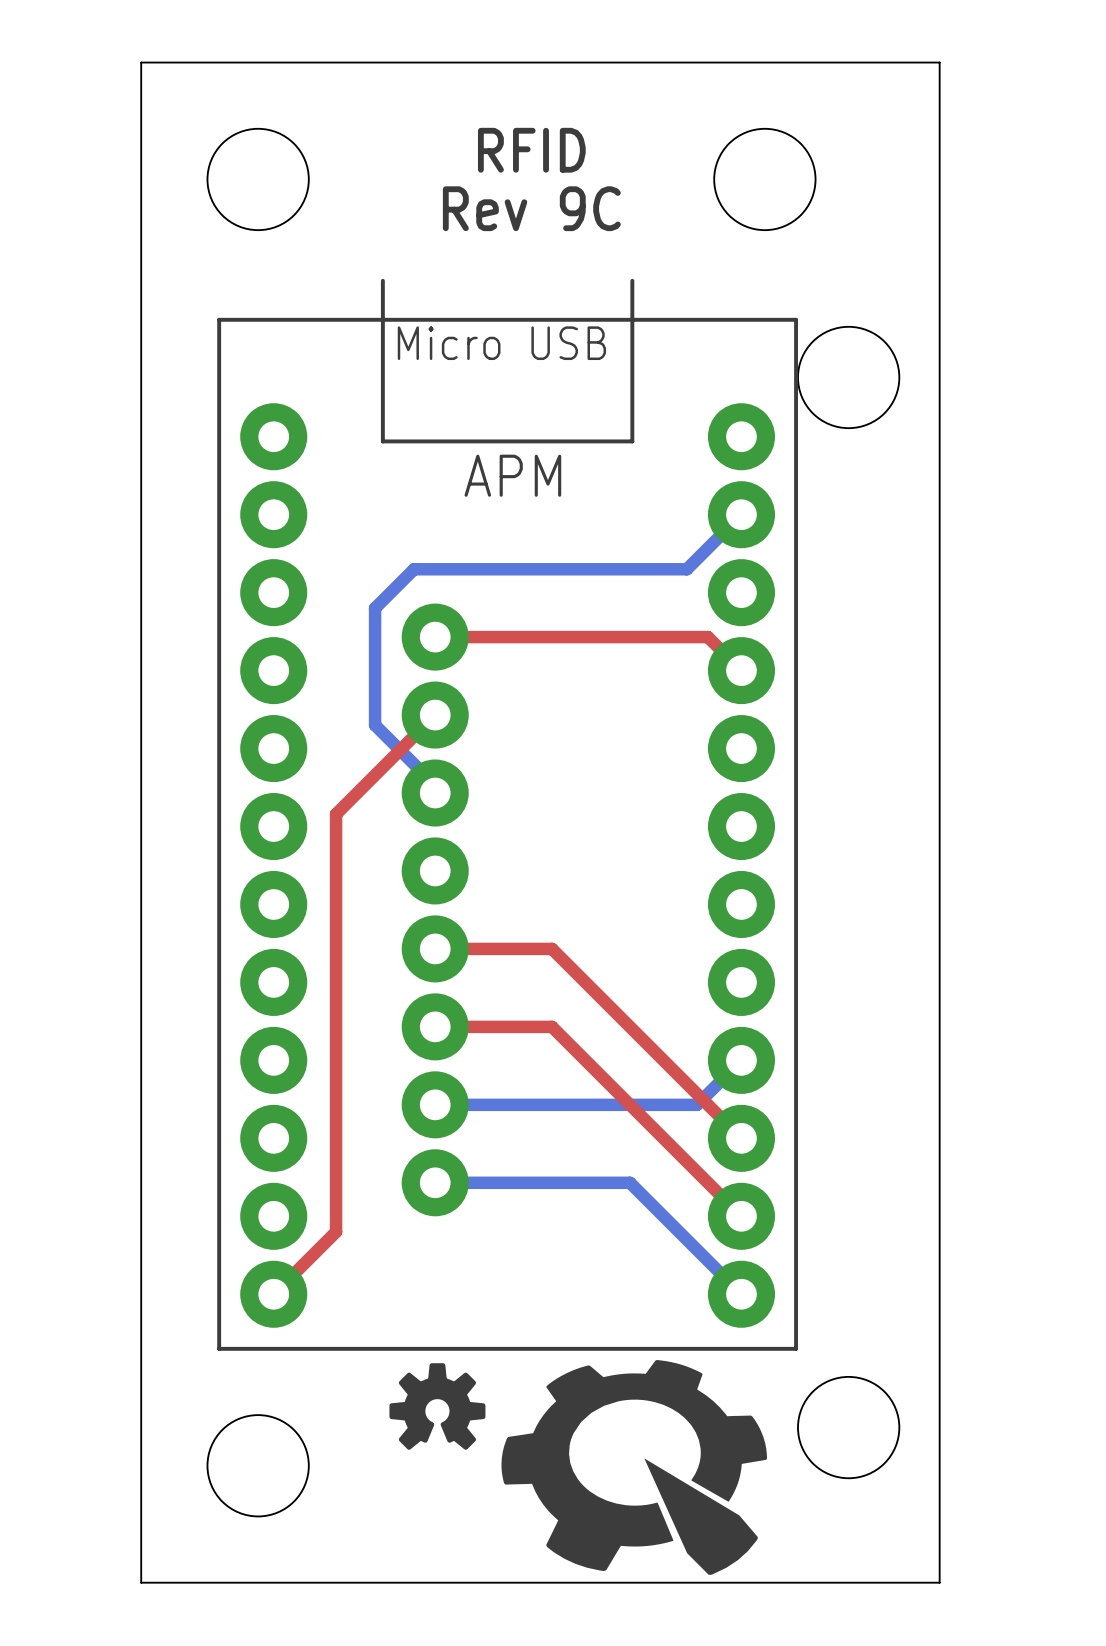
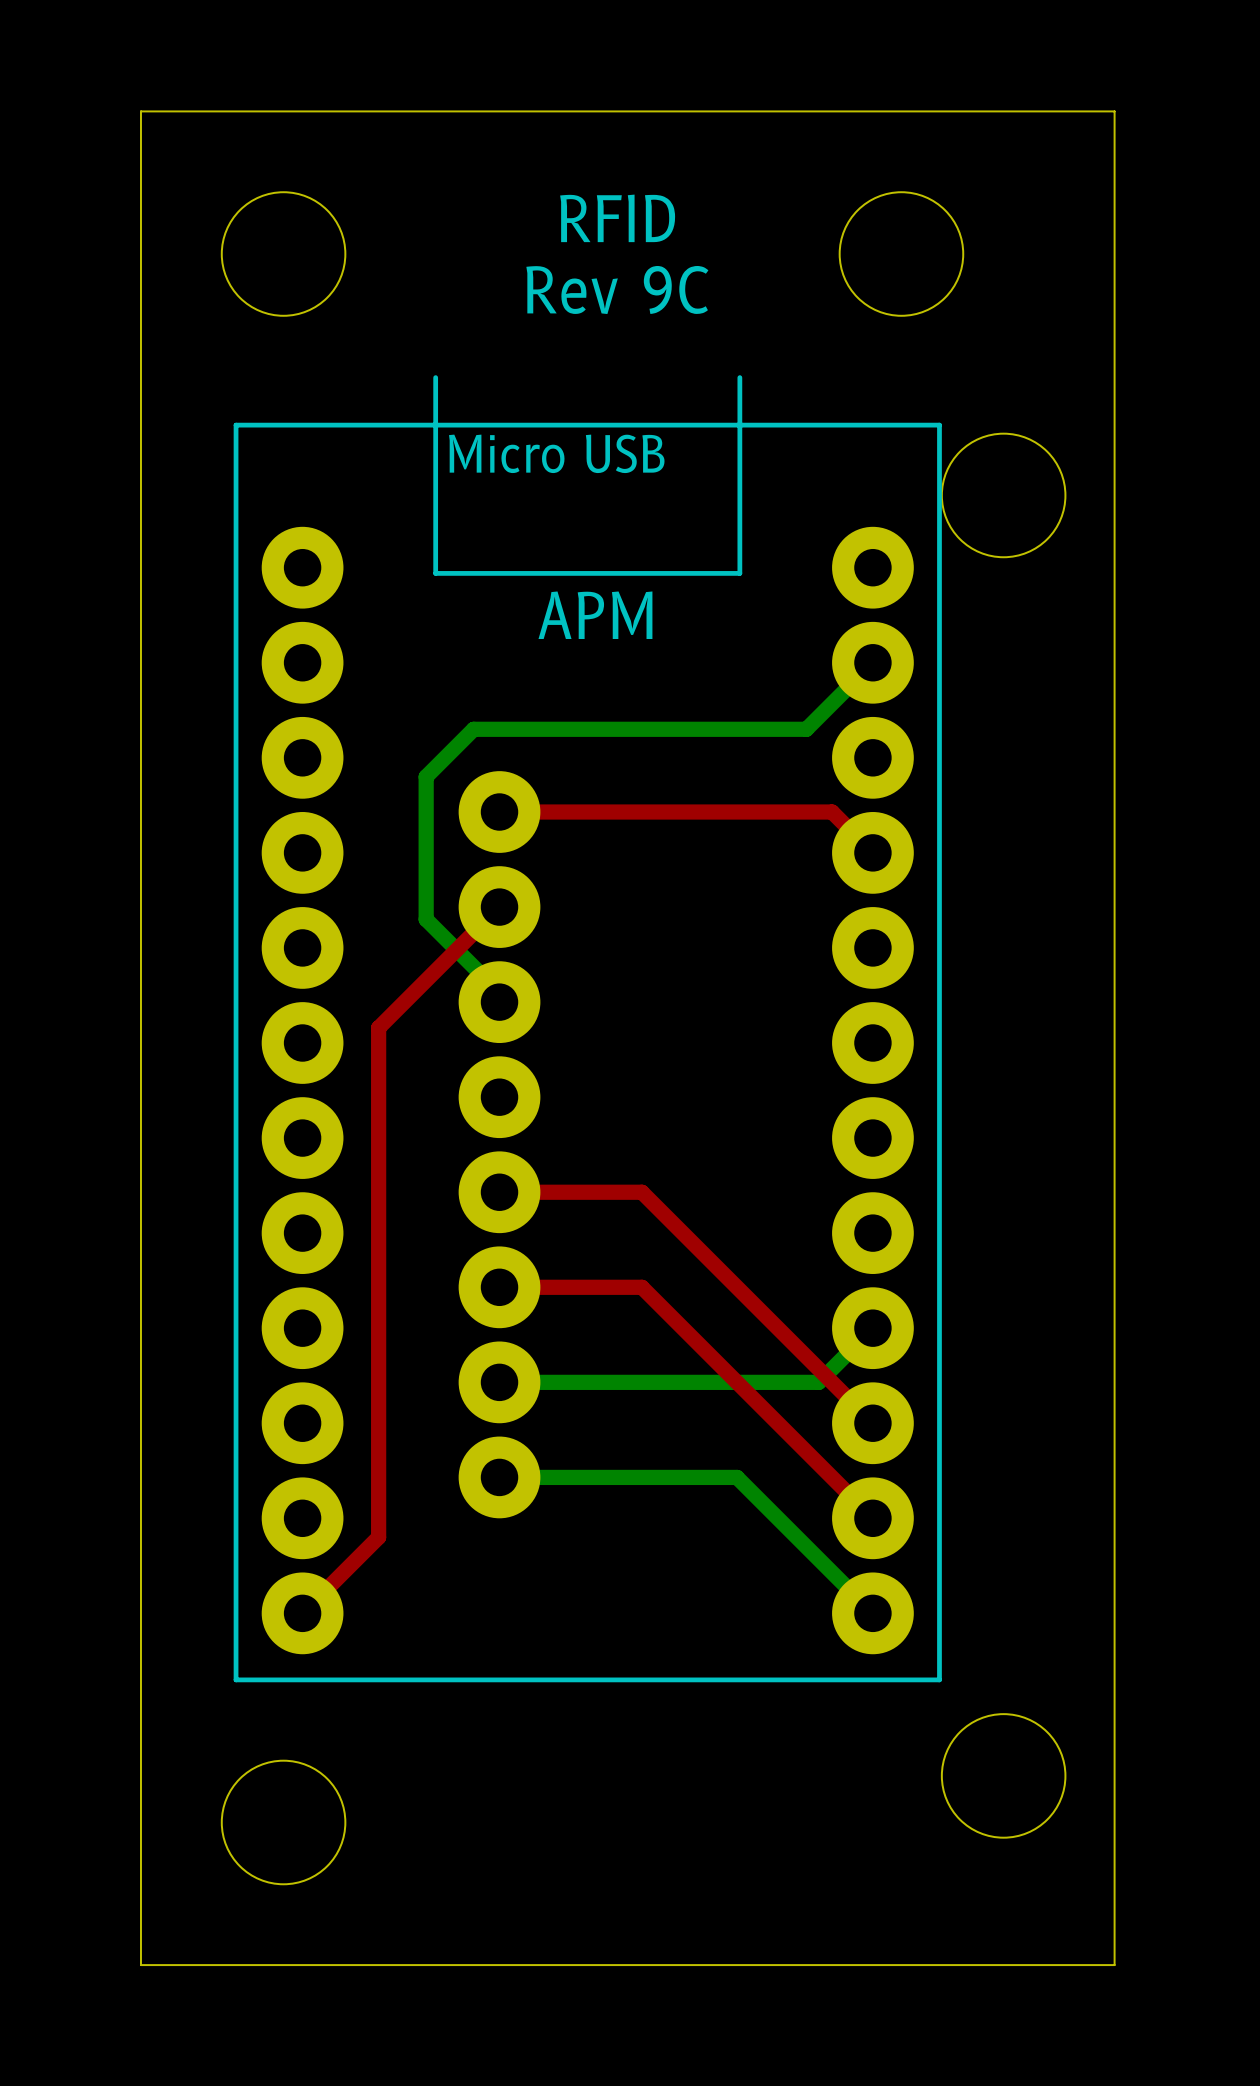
drawing: [389, 1360, 768, 1575] -> none

